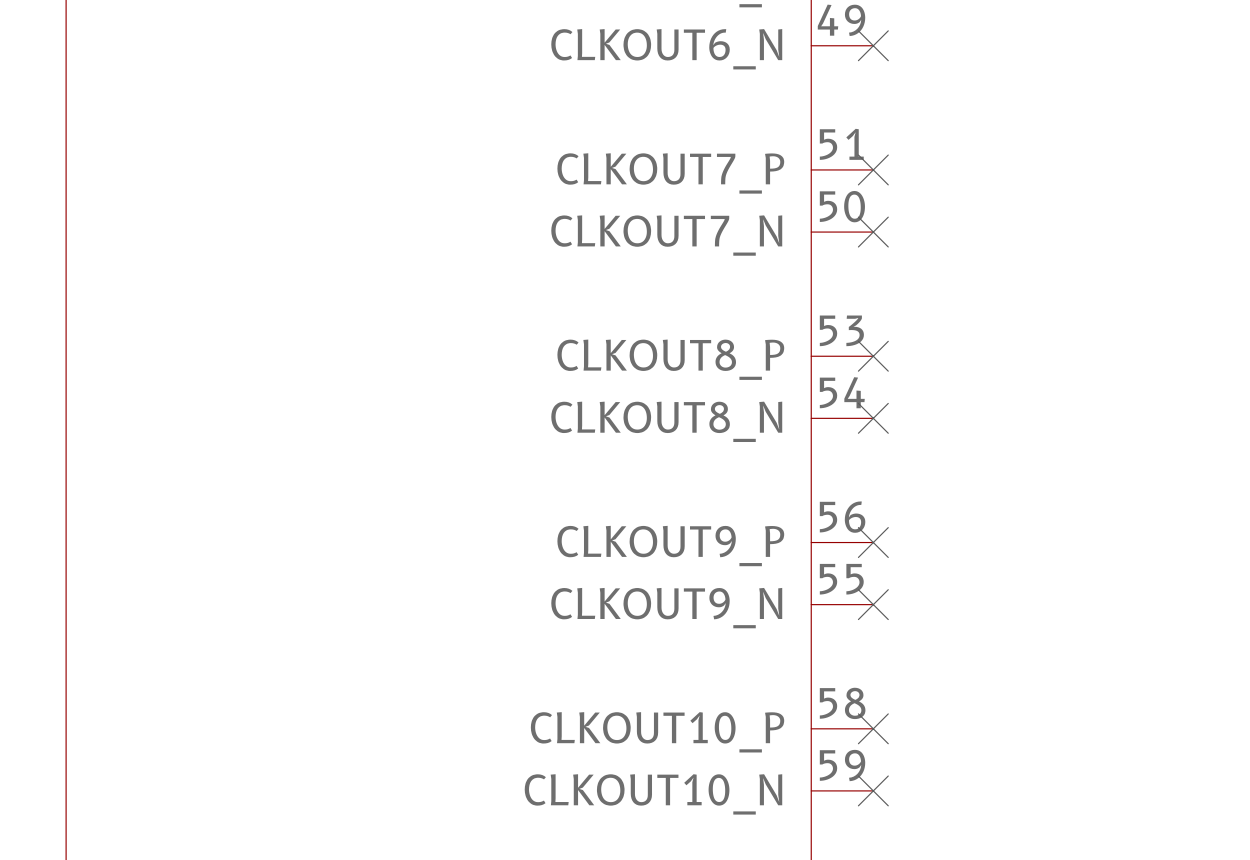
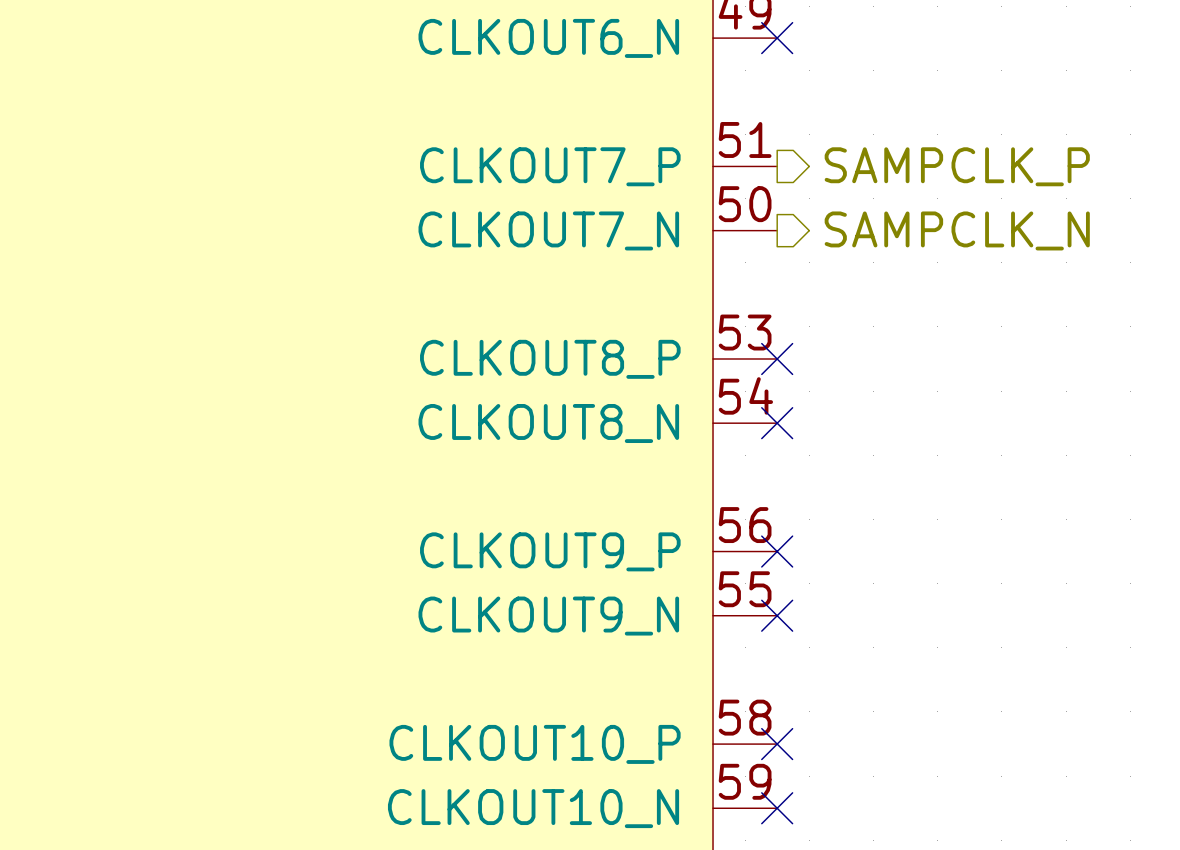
no-connect mark: (873, 169) -> none
hierarchical label: none -> SAMPCLK_P (957, 166)
no-connect mark: (873, 232) -> none
hierarchical label: none -> SAMPCLK_N (957, 230)

